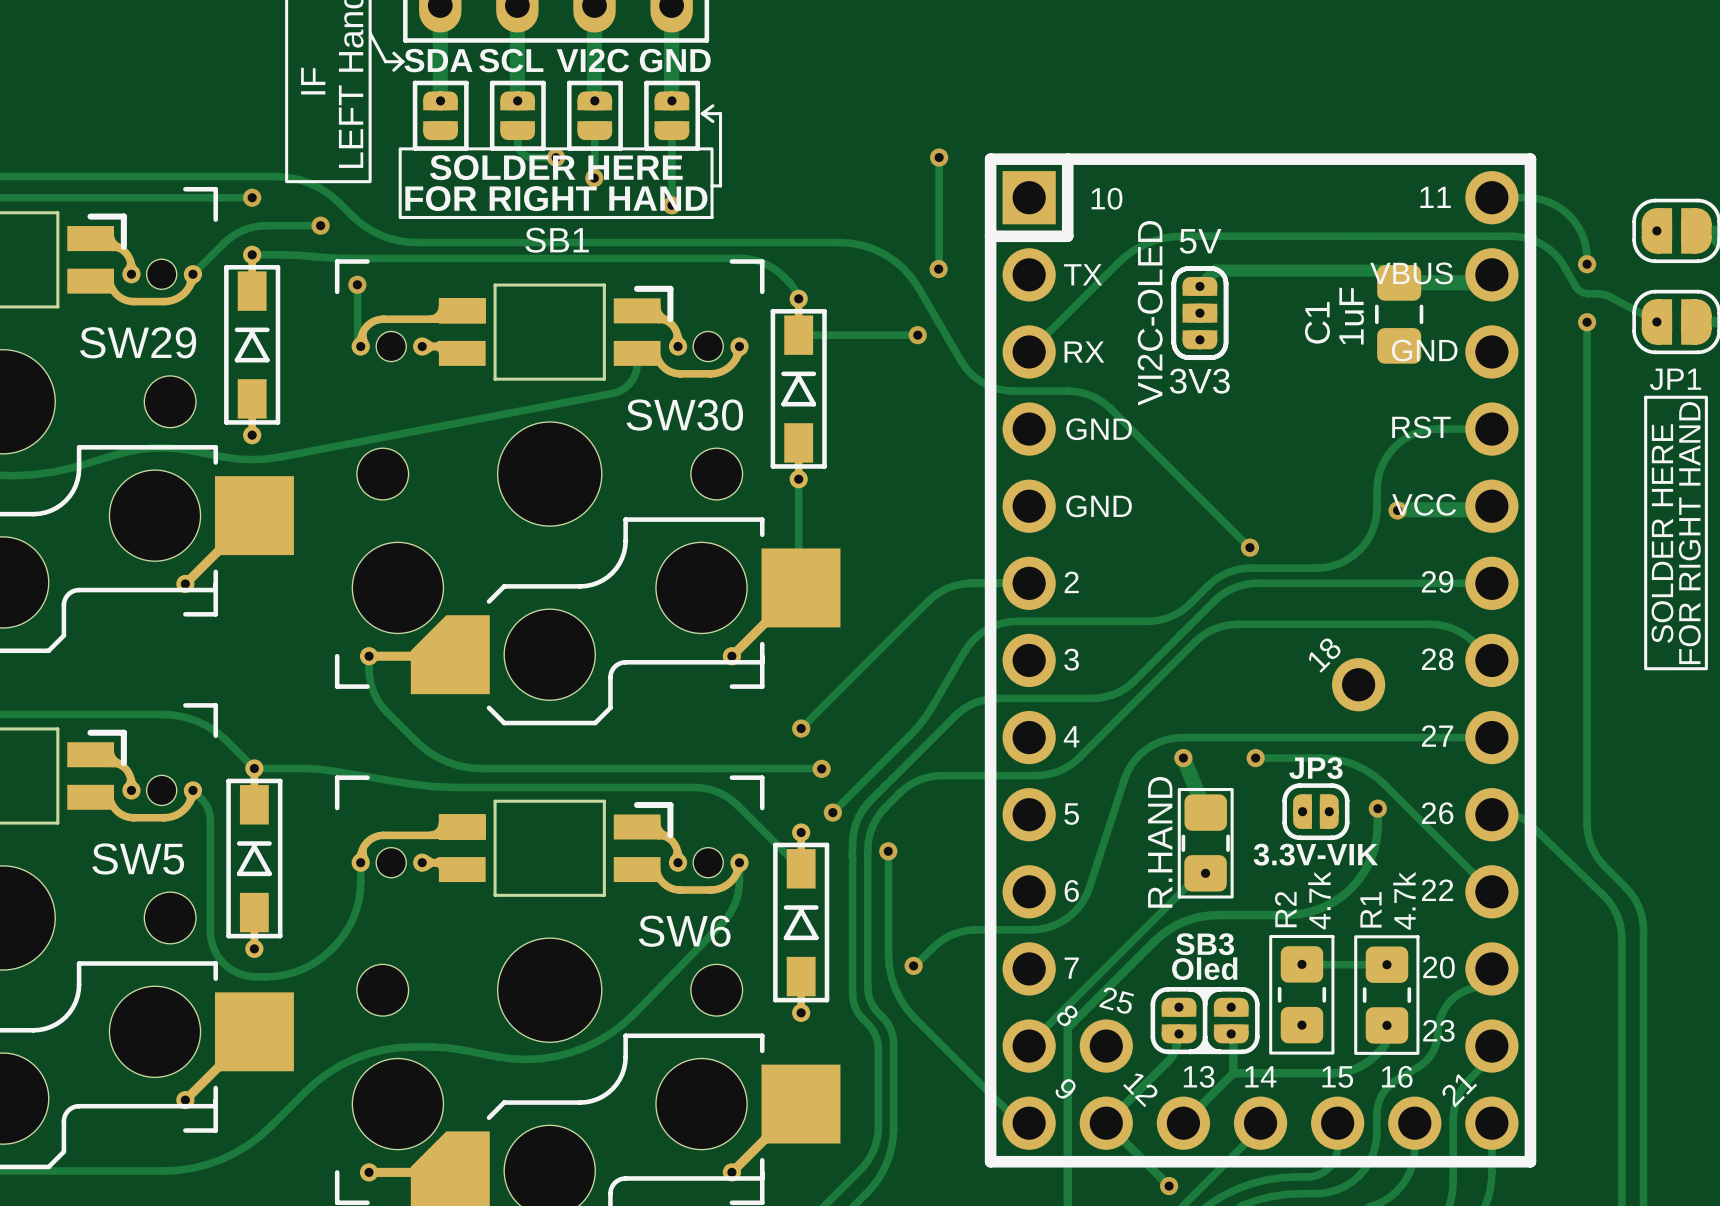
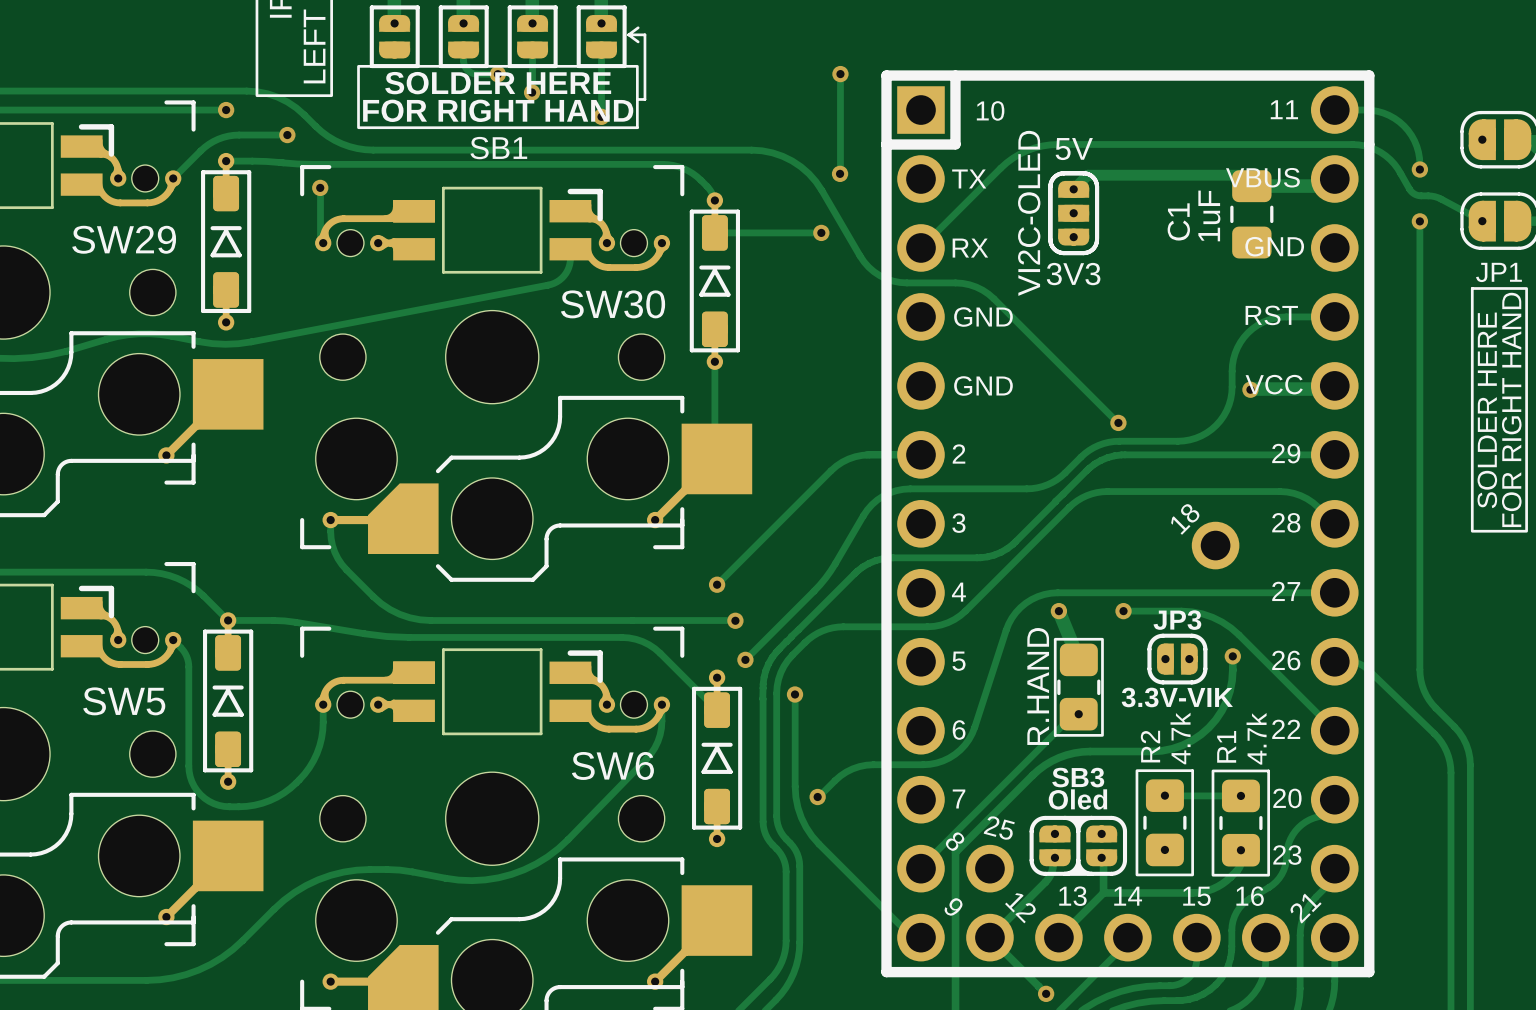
part footprint: [224, 245, 281, 445] -> [201, 152, 252, 331]
part footprint: [770, 289, 827, 489] -> [689, 192, 740, 370]
part footprint: [226, 759, 283, 958] -> [203, 612, 254, 790]
part footprint: [773, 823, 830, 1022] -> [691, 669, 743, 848]

